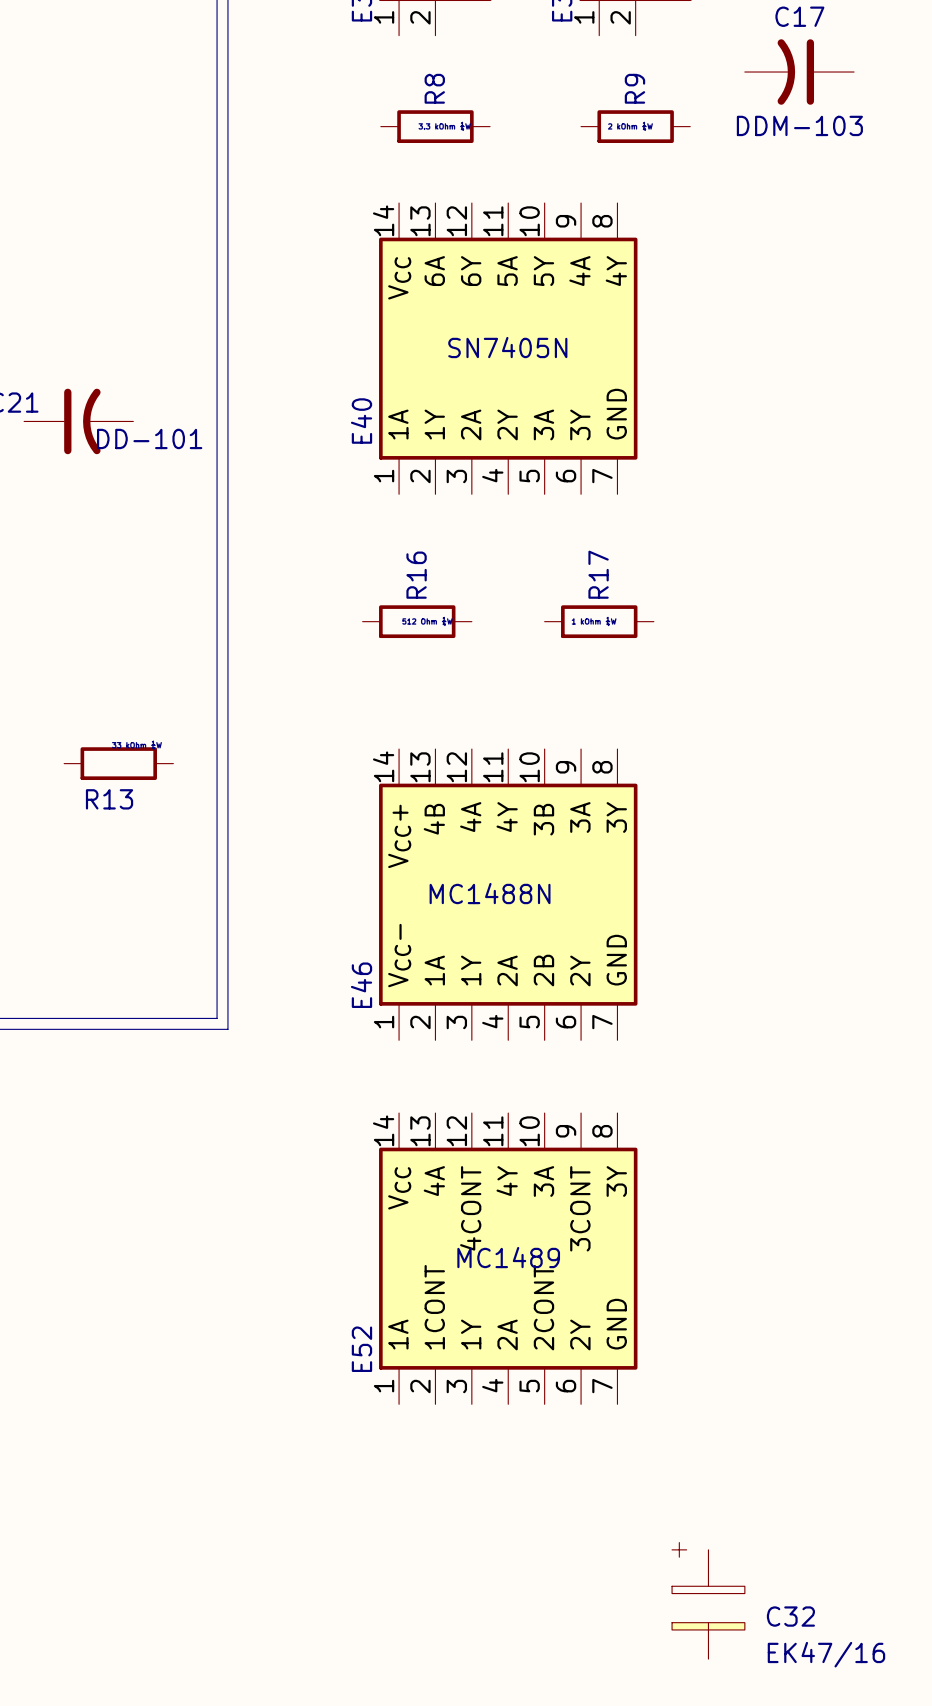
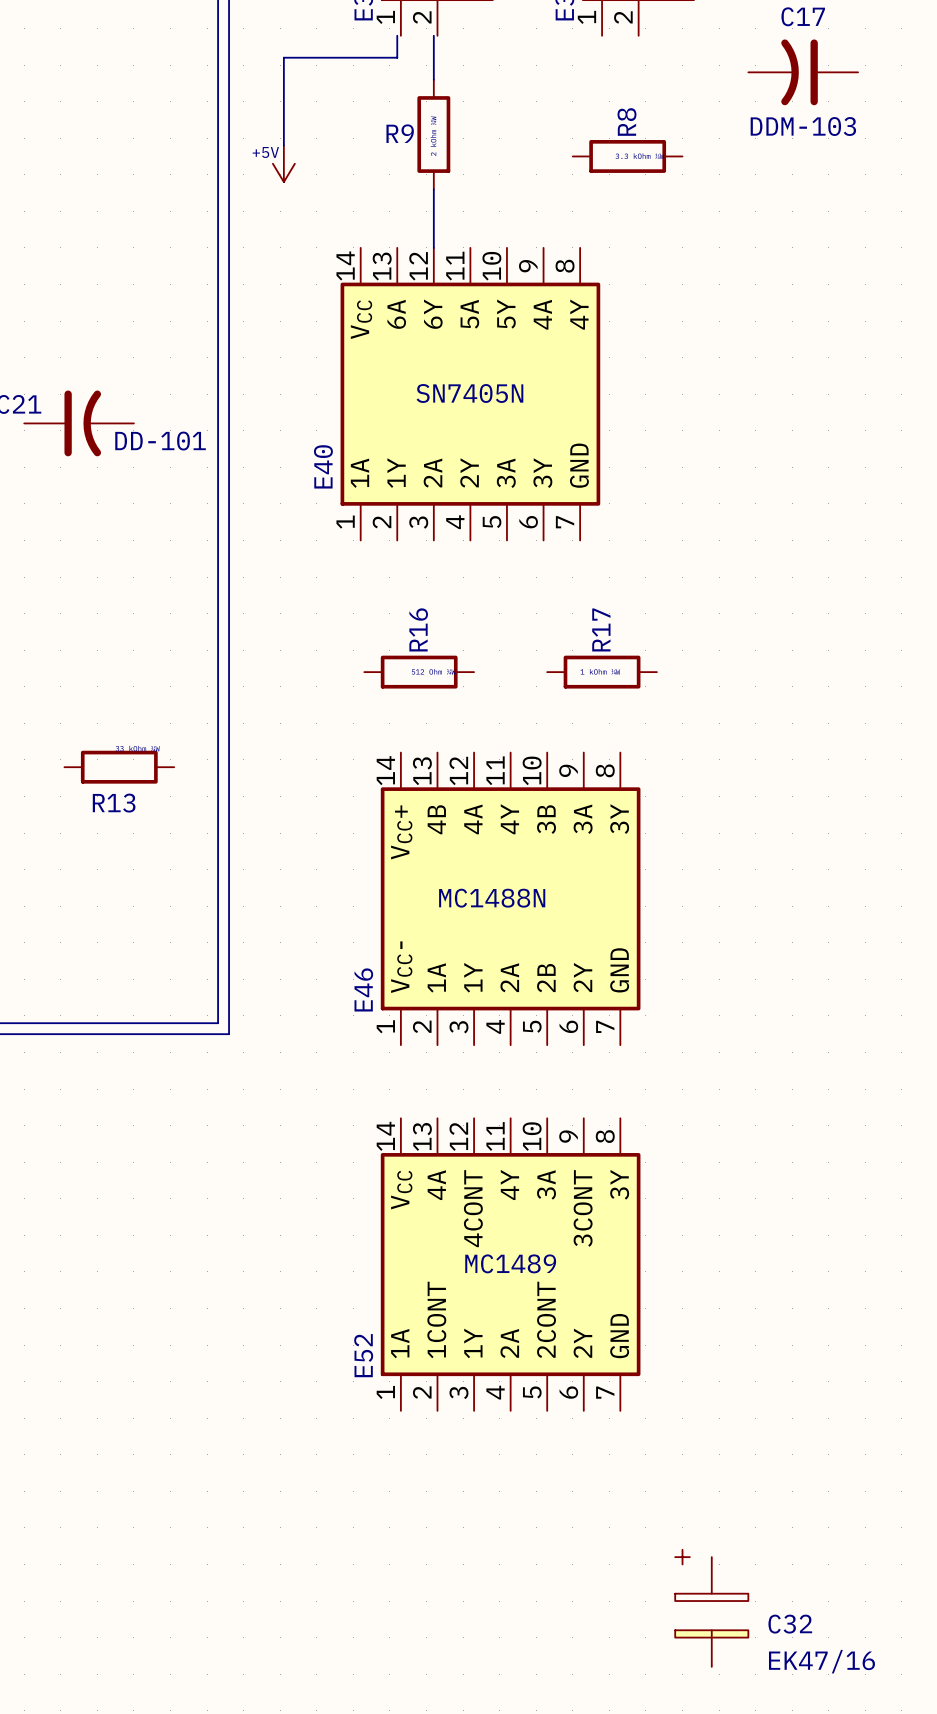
wire: none -> (397, 35) (397, 57) (283, 57) (283, 145)
wire: none -> (433, 35) (433, 79)
R9 name position: R9 (634, 88) -> R9 (400, 133)
R8 position: (435, 126) -> (627, 156)
R9 rotation: 0° (635, 126) -> 90° clockwise (433, 134)
R9 position: (635, 126) -> (433, 134)
power symbol: none -> +5V (283, 163)
wire: none -> (433, 189) (433, 247)
E40 position: (500, 348) -> (462, 394)
R16 position: (417, 621) -> (419, 672)
R17 position: (599, 621) -> (602, 672)

